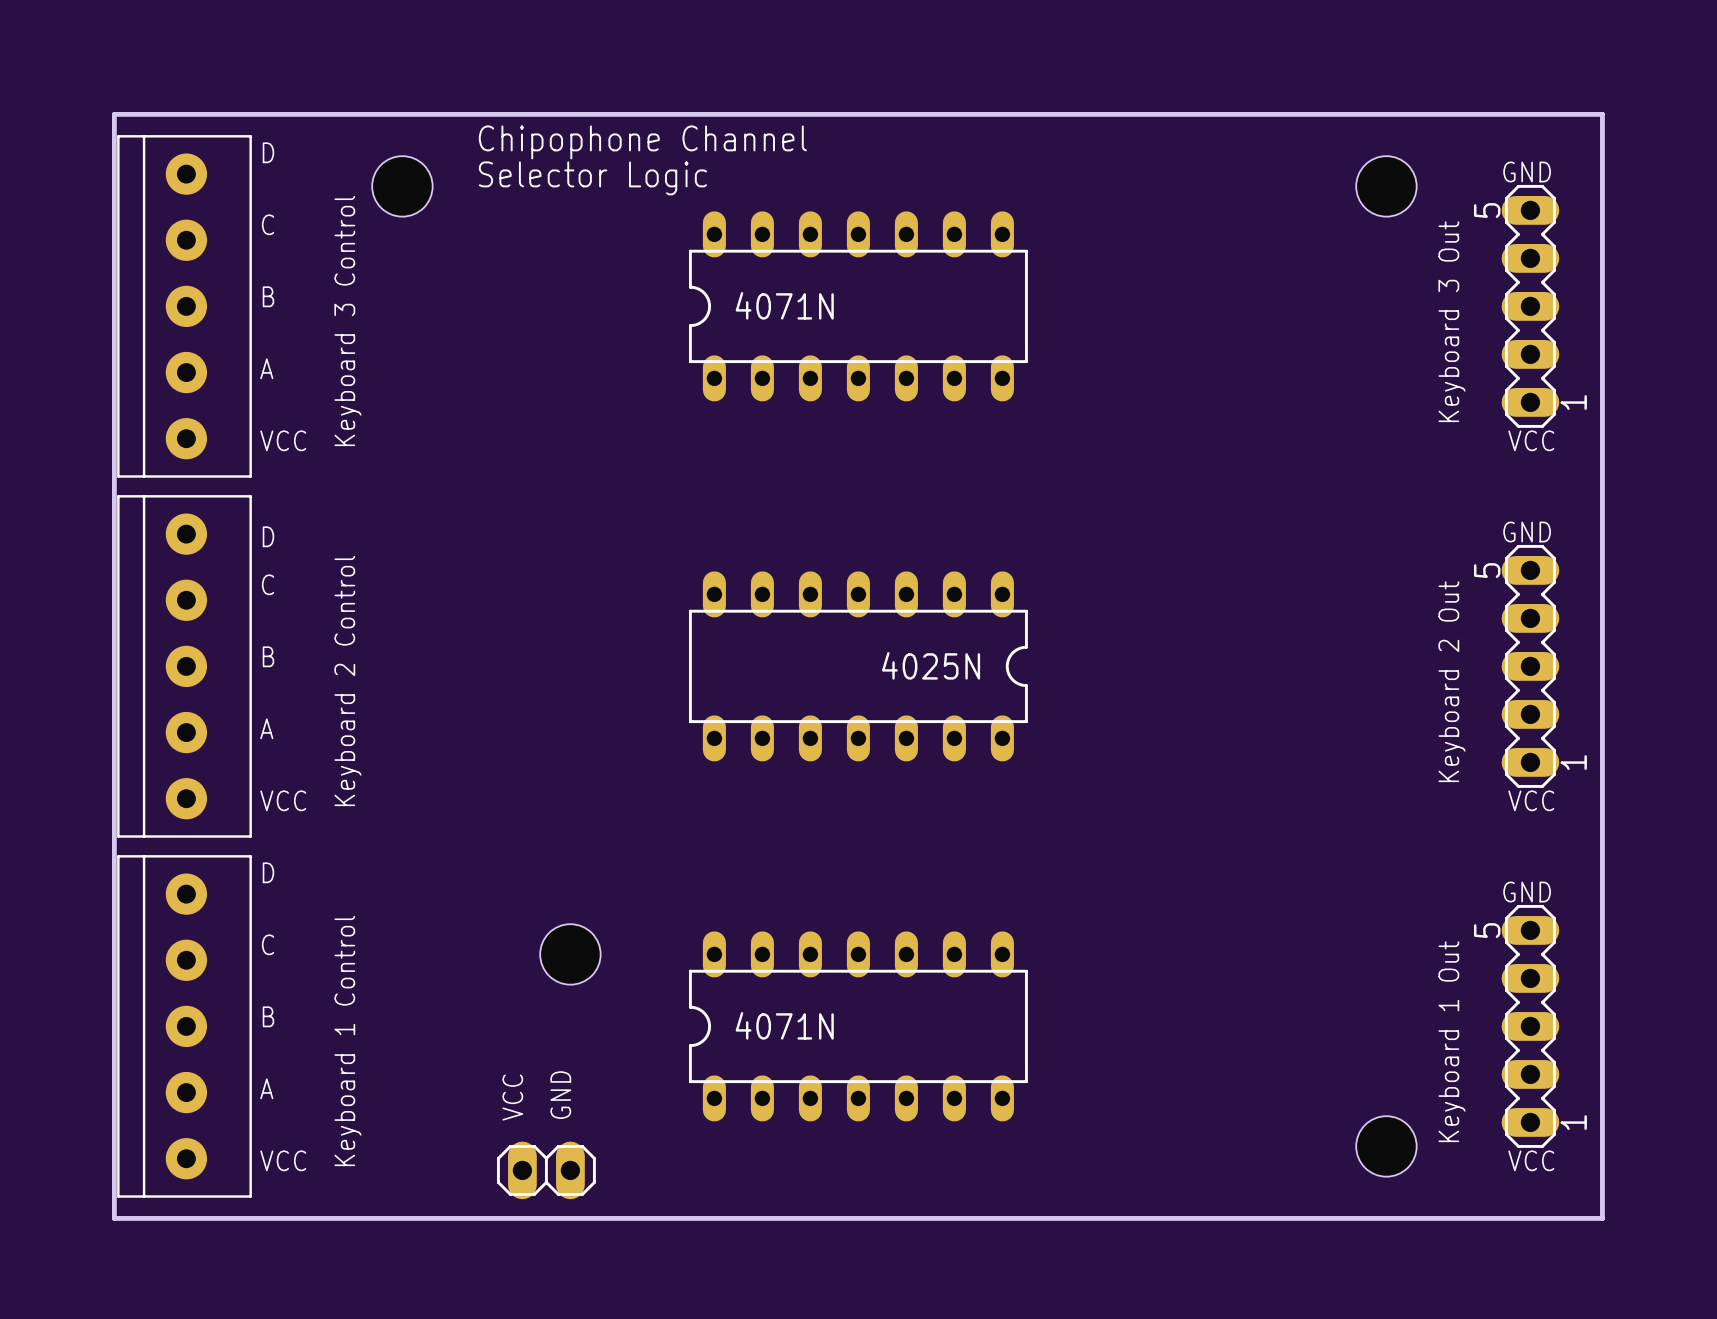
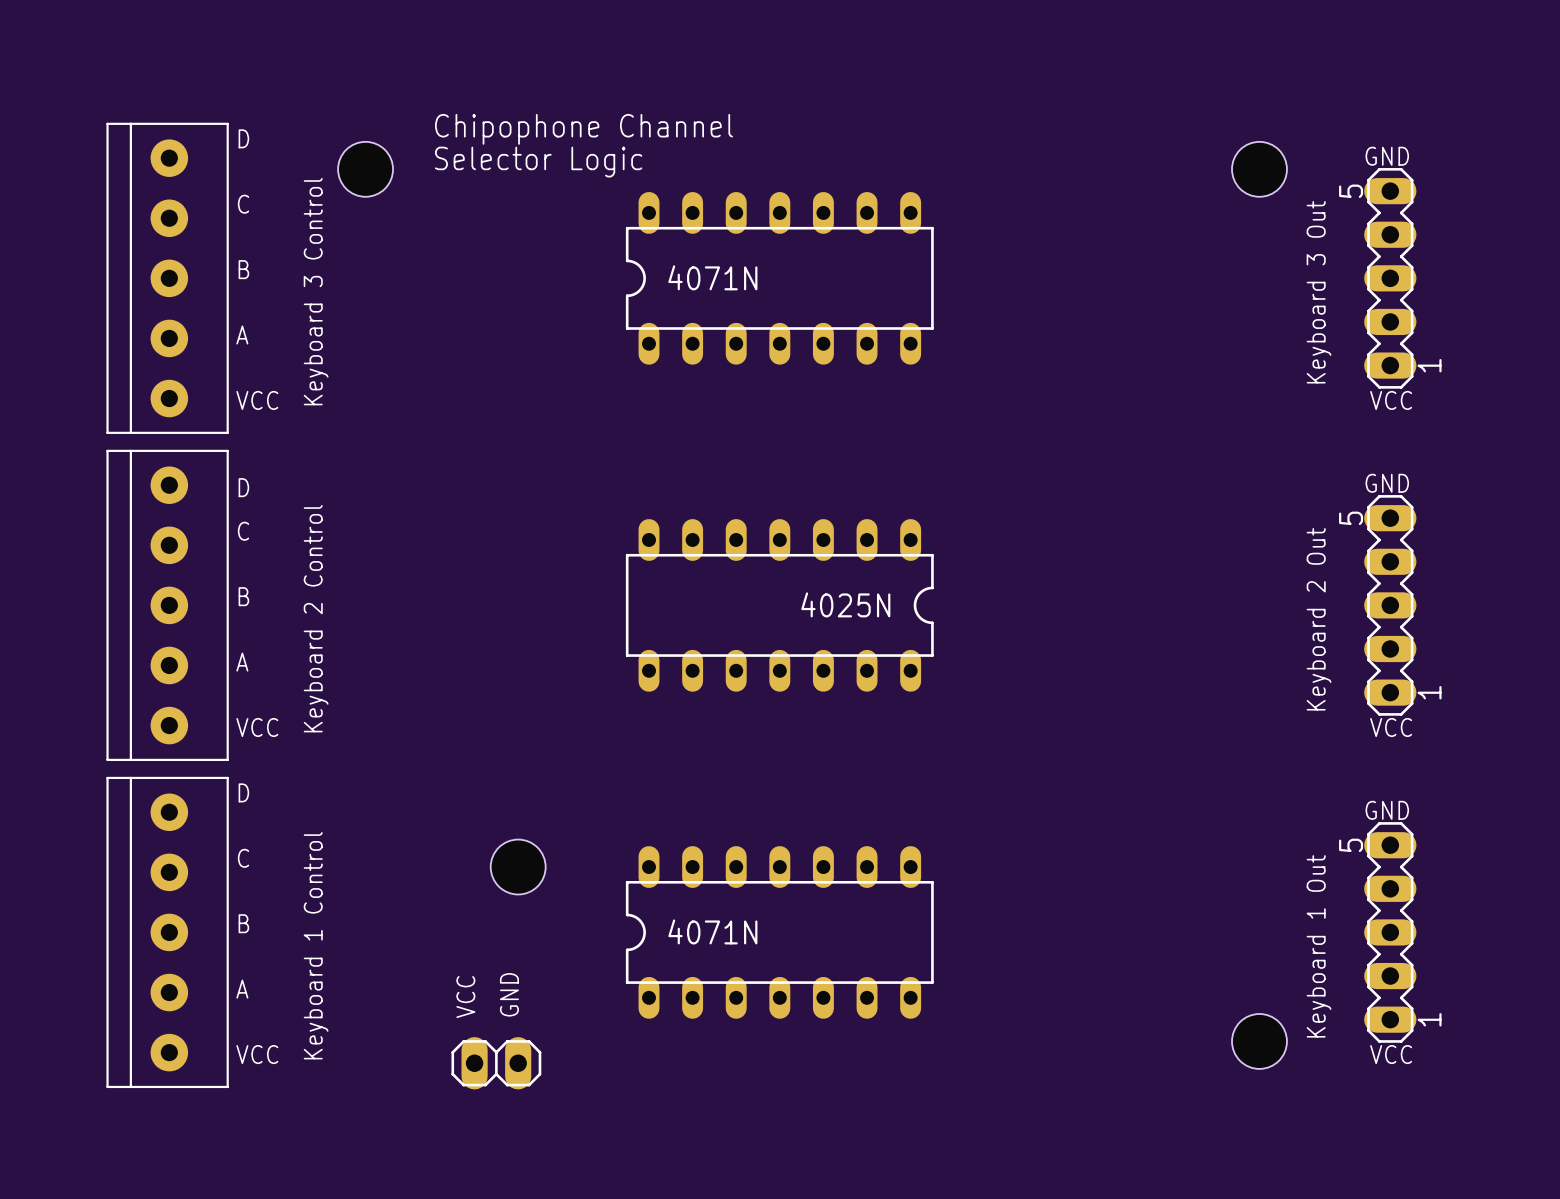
board edge: (114, 114) (114, 1218) (1602, 1218) (1602, 114) (114, 114) -> none

